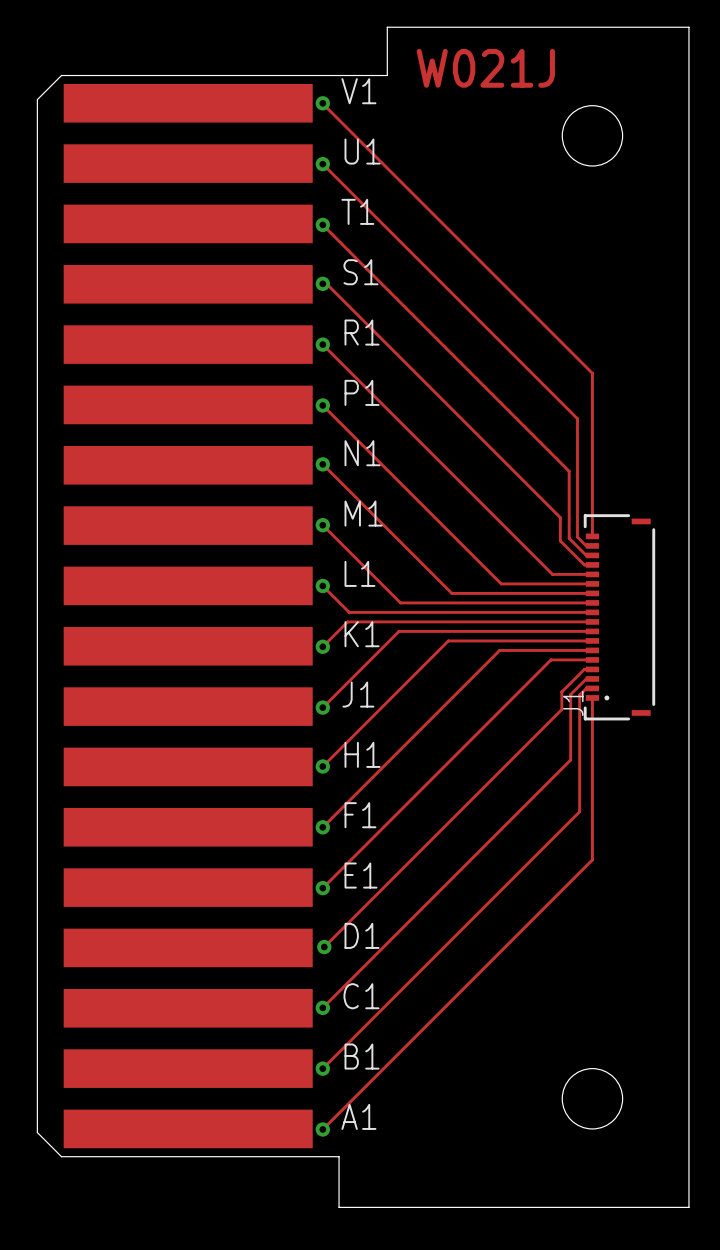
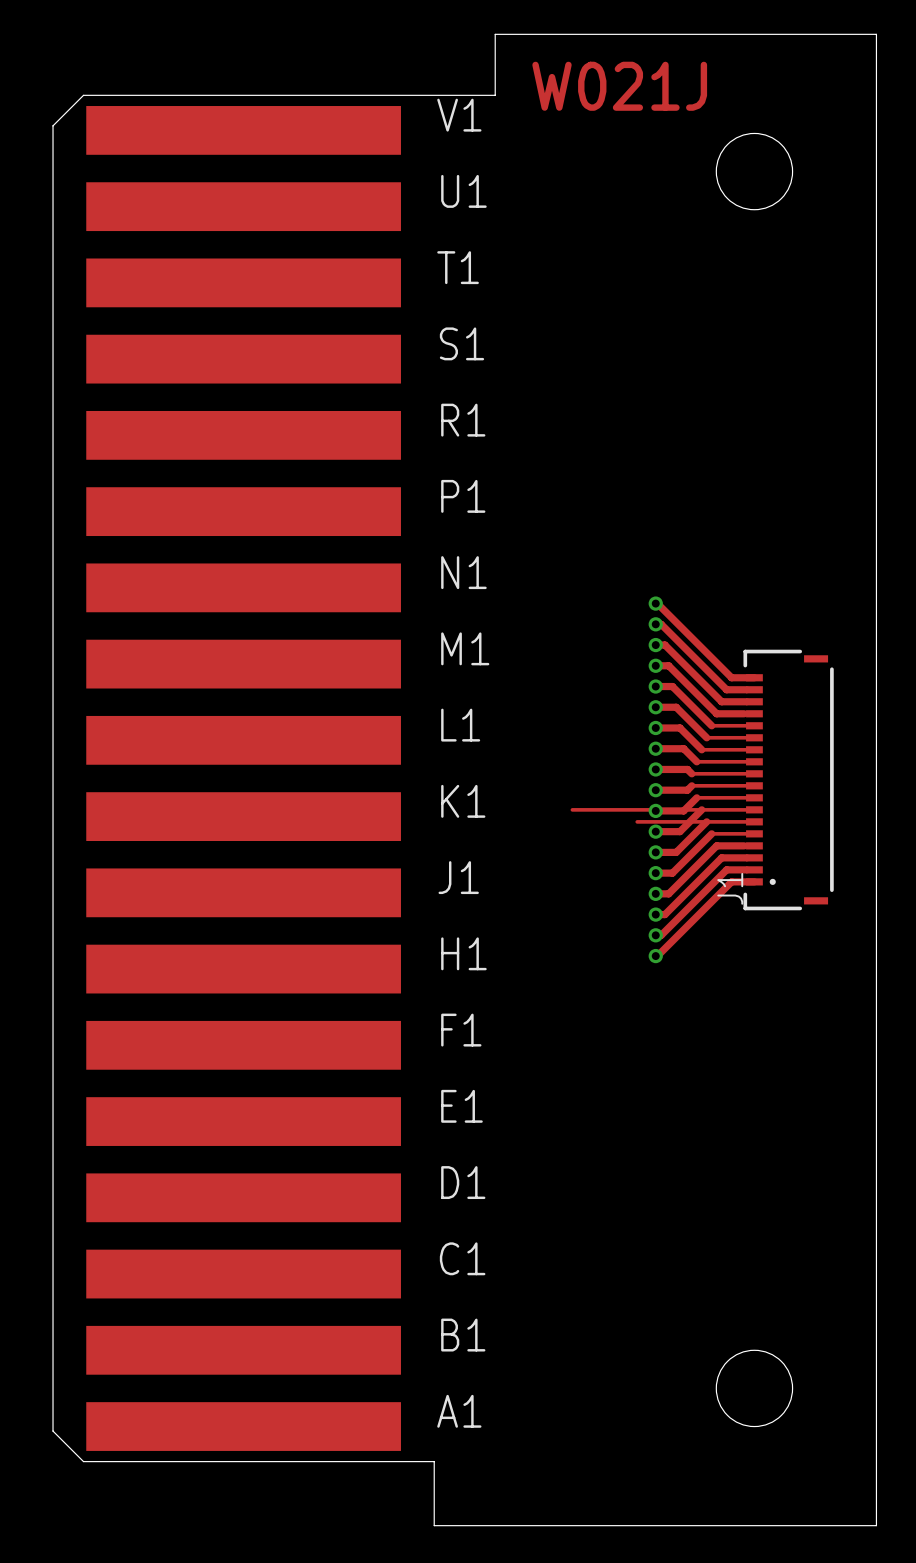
track: (322, 103) (592, 373) (592, 536) -> (655, 603) (731, 677) (754, 677)
via: (322, 103) -> none
track: (322, 164) (577, 418) (577, 537) (586, 545) -> (655, 624) (661, 624) (726, 689) (746, 689)
via: (322, 164) -> none
track: (322, 224) (569, 471) (569, 538) (586, 555) -> (655, 645) (664, 645) (721, 701) (746, 701)
via: (322, 224) -> none
track: (322, 283) (326, 283) (560, 517) (560, 540) (584, 564) -> (655, 665) (668, 665) (716, 713) (744, 713)
via: (322, 283) -> none
track: (322, 344) (552, 574) (558, 574) -> (655, 686) (672, 686) (711, 725)
via: (322, 344) -> none
track: (322, 405) (501, 583) (554, 583) -> (655, 707) (676, 707) (706, 737)
via: (322, 405) -> none
track: (322, 464) (451, 593) (550, 593) -> (655, 727) (679, 727) (701, 749)
via: (322, 464) -> none
via: none -> (655, 603)
via: none -> (655, 624)
via: none -> (655, 645)
track: (322, 525) (400, 602) (546, 602) -> (655, 748) (683, 748) (696, 761)
via: (322, 525) -> none
via: none -> (655, 665)
via: none -> (655, 686)
via: none -> (655, 707)
via: none -> (655, 727)
track: (322, 585) (349, 612) (542, 612) -> (655, 769) (687, 769) (691, 773)
via: (322, 585) -> none
via: none -> (655, 748)
via: none -> (655, 769)
track: (542, 621) (347, 621) (322, 646) -> (691, 785) (687, 790) (655, 790)
via: none -> (655, 790)
track: (546, 631) (398, 631) (322, 707) -> (696, 797) (683, 810) (655, 810)
track: (448, 640) (322, 766) -> none
track: none -> (701, 809) (679, 831) (655, 831)
via: none -> (655, 810)
via: (322, 646) -> none
track: (499, 650) (322, 827) -> none
track: none -> (706, 821) (676, 852) (655, 852)
via: none -> (655, 831)
track: (558, 659) (551, 659) (322, 888) -> (711, 833) (672, 873) (655, 873)
track: (584, 669) (561, 691) (561, 709) (324, 947) -> (744, 845) (716, 845) (668, 893) (655, 893)
via: none -> (655, 852)
track: (586, 678) (570, 694) (570, 760) (322, 1007) -> (746, 857) (721, 857) (664, 914) (655, 914)
track: (586, 688) (579, 695) (579, 811) (322, 1068) -> (746, 869) (726, 869) (661, 935) (655, 935)
via: none -> (655, 873)
track: (592, 697) (592, 859) (322, 1129) -> (754, 881) (731, 881) (655, 956)
via: (322, 707) -> none
via: none -> (655, 893)
via: none -> (655, 914)
via: none -> (655, 935)
via: none -> (655, 956)
via: (322, 766) -> none
via: (322, 827) -> none
via: (322, 888) -> none
via: (324, 947) -> none
via: (322, 1007) -> none
via: (322, 1068) -> none
via: (322, 1129) -> none

